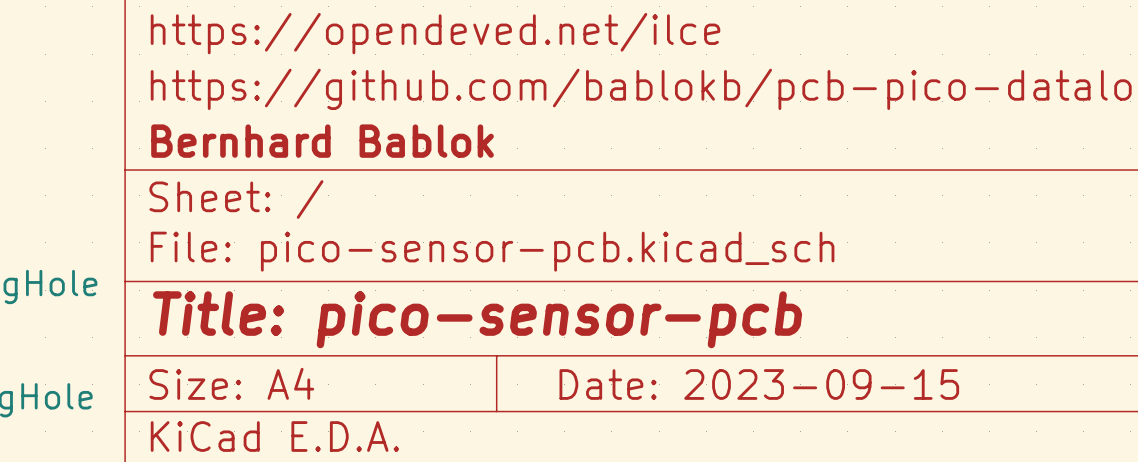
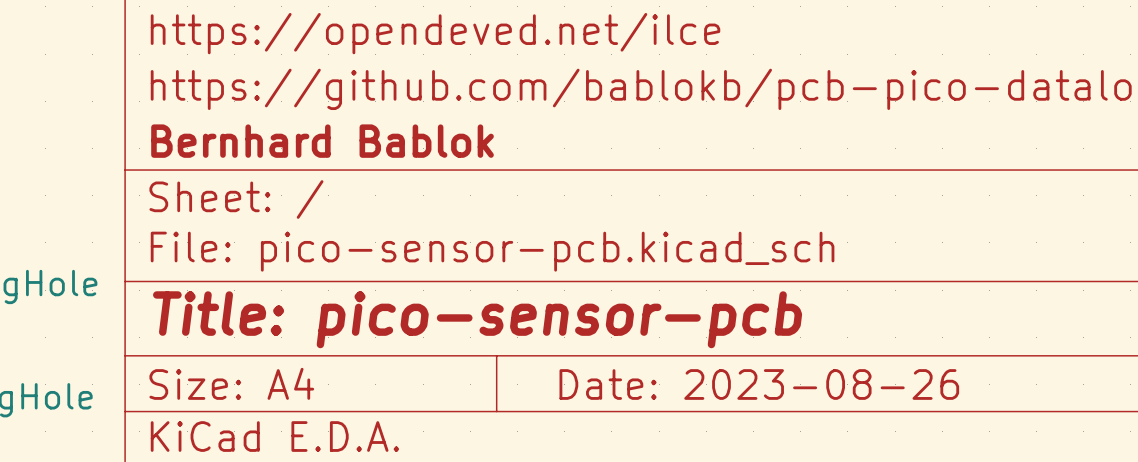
title block: Date: 2023-09-15 (759, 384) -> Date: 2023-08-26 (759, 384)

